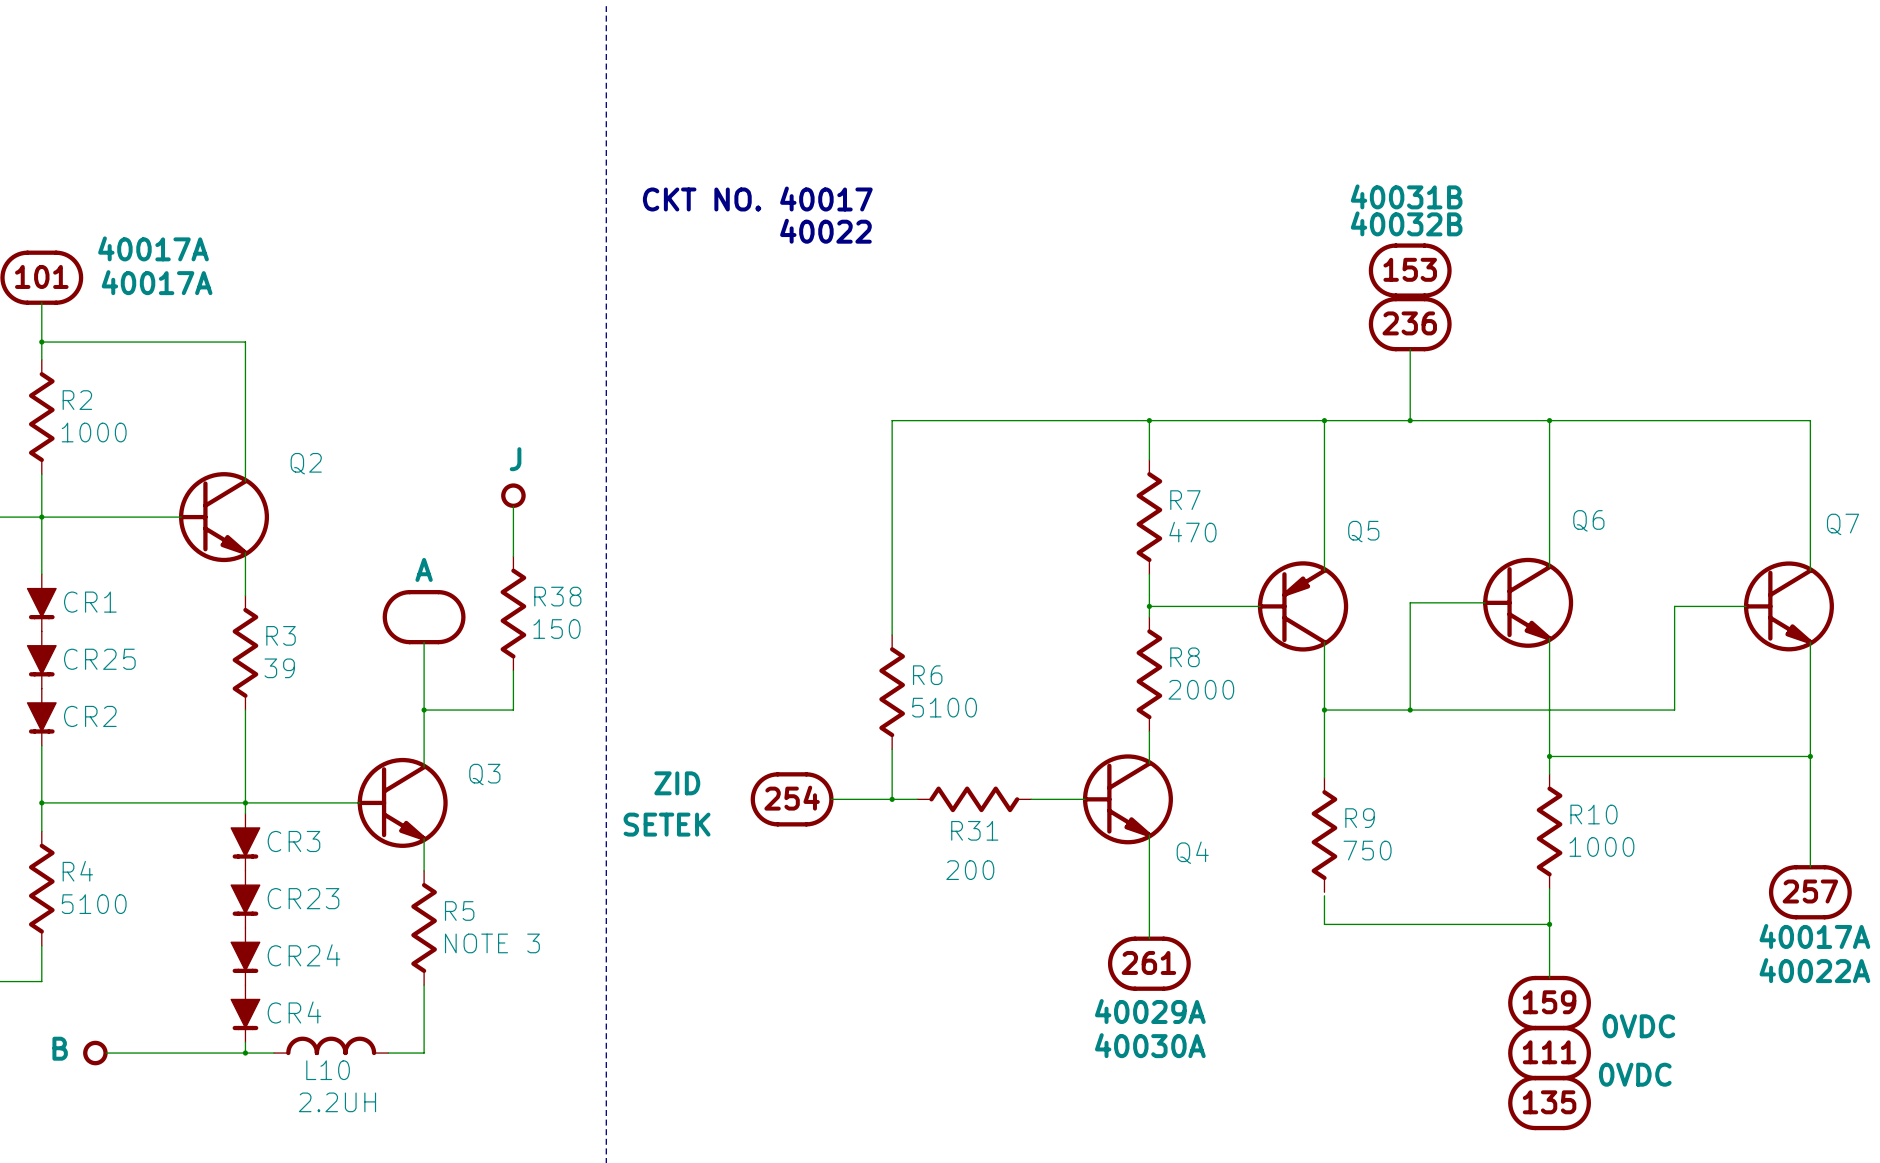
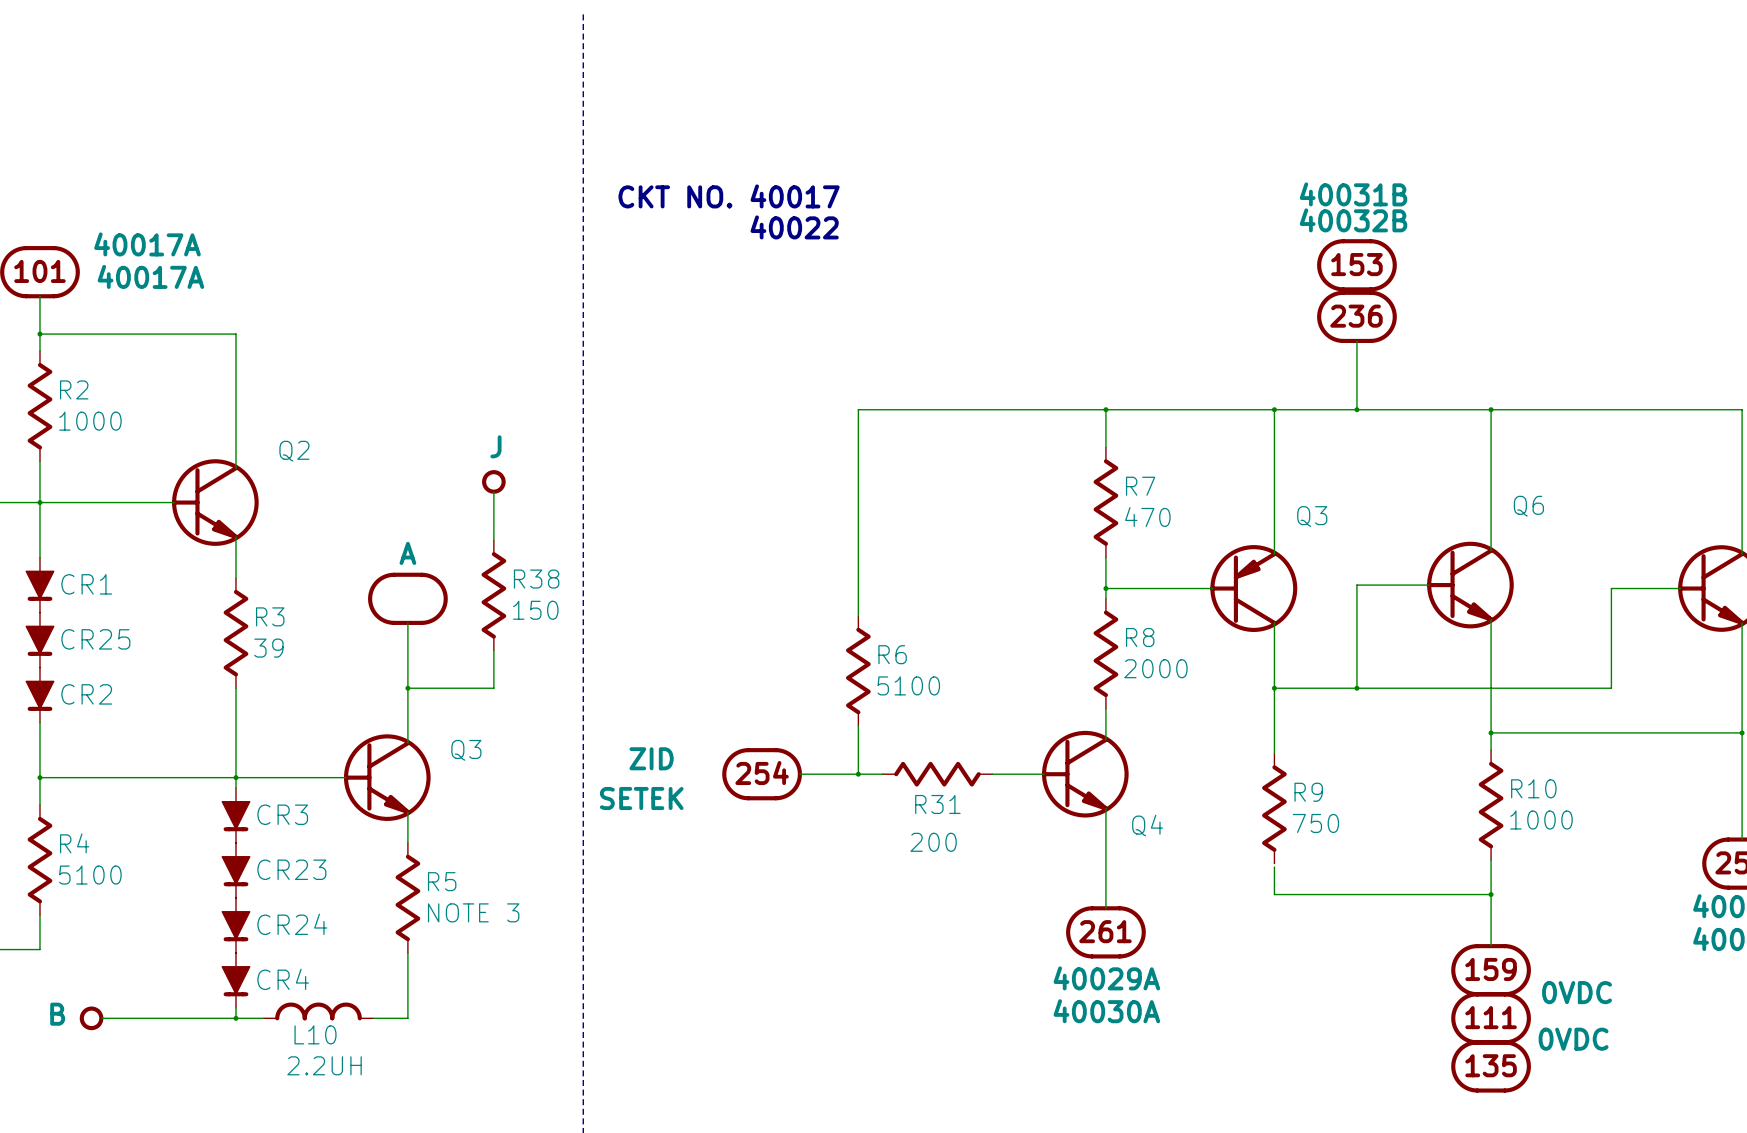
Q5 name: Q5 (1363, 531) -> Q3 (1312, 516)

